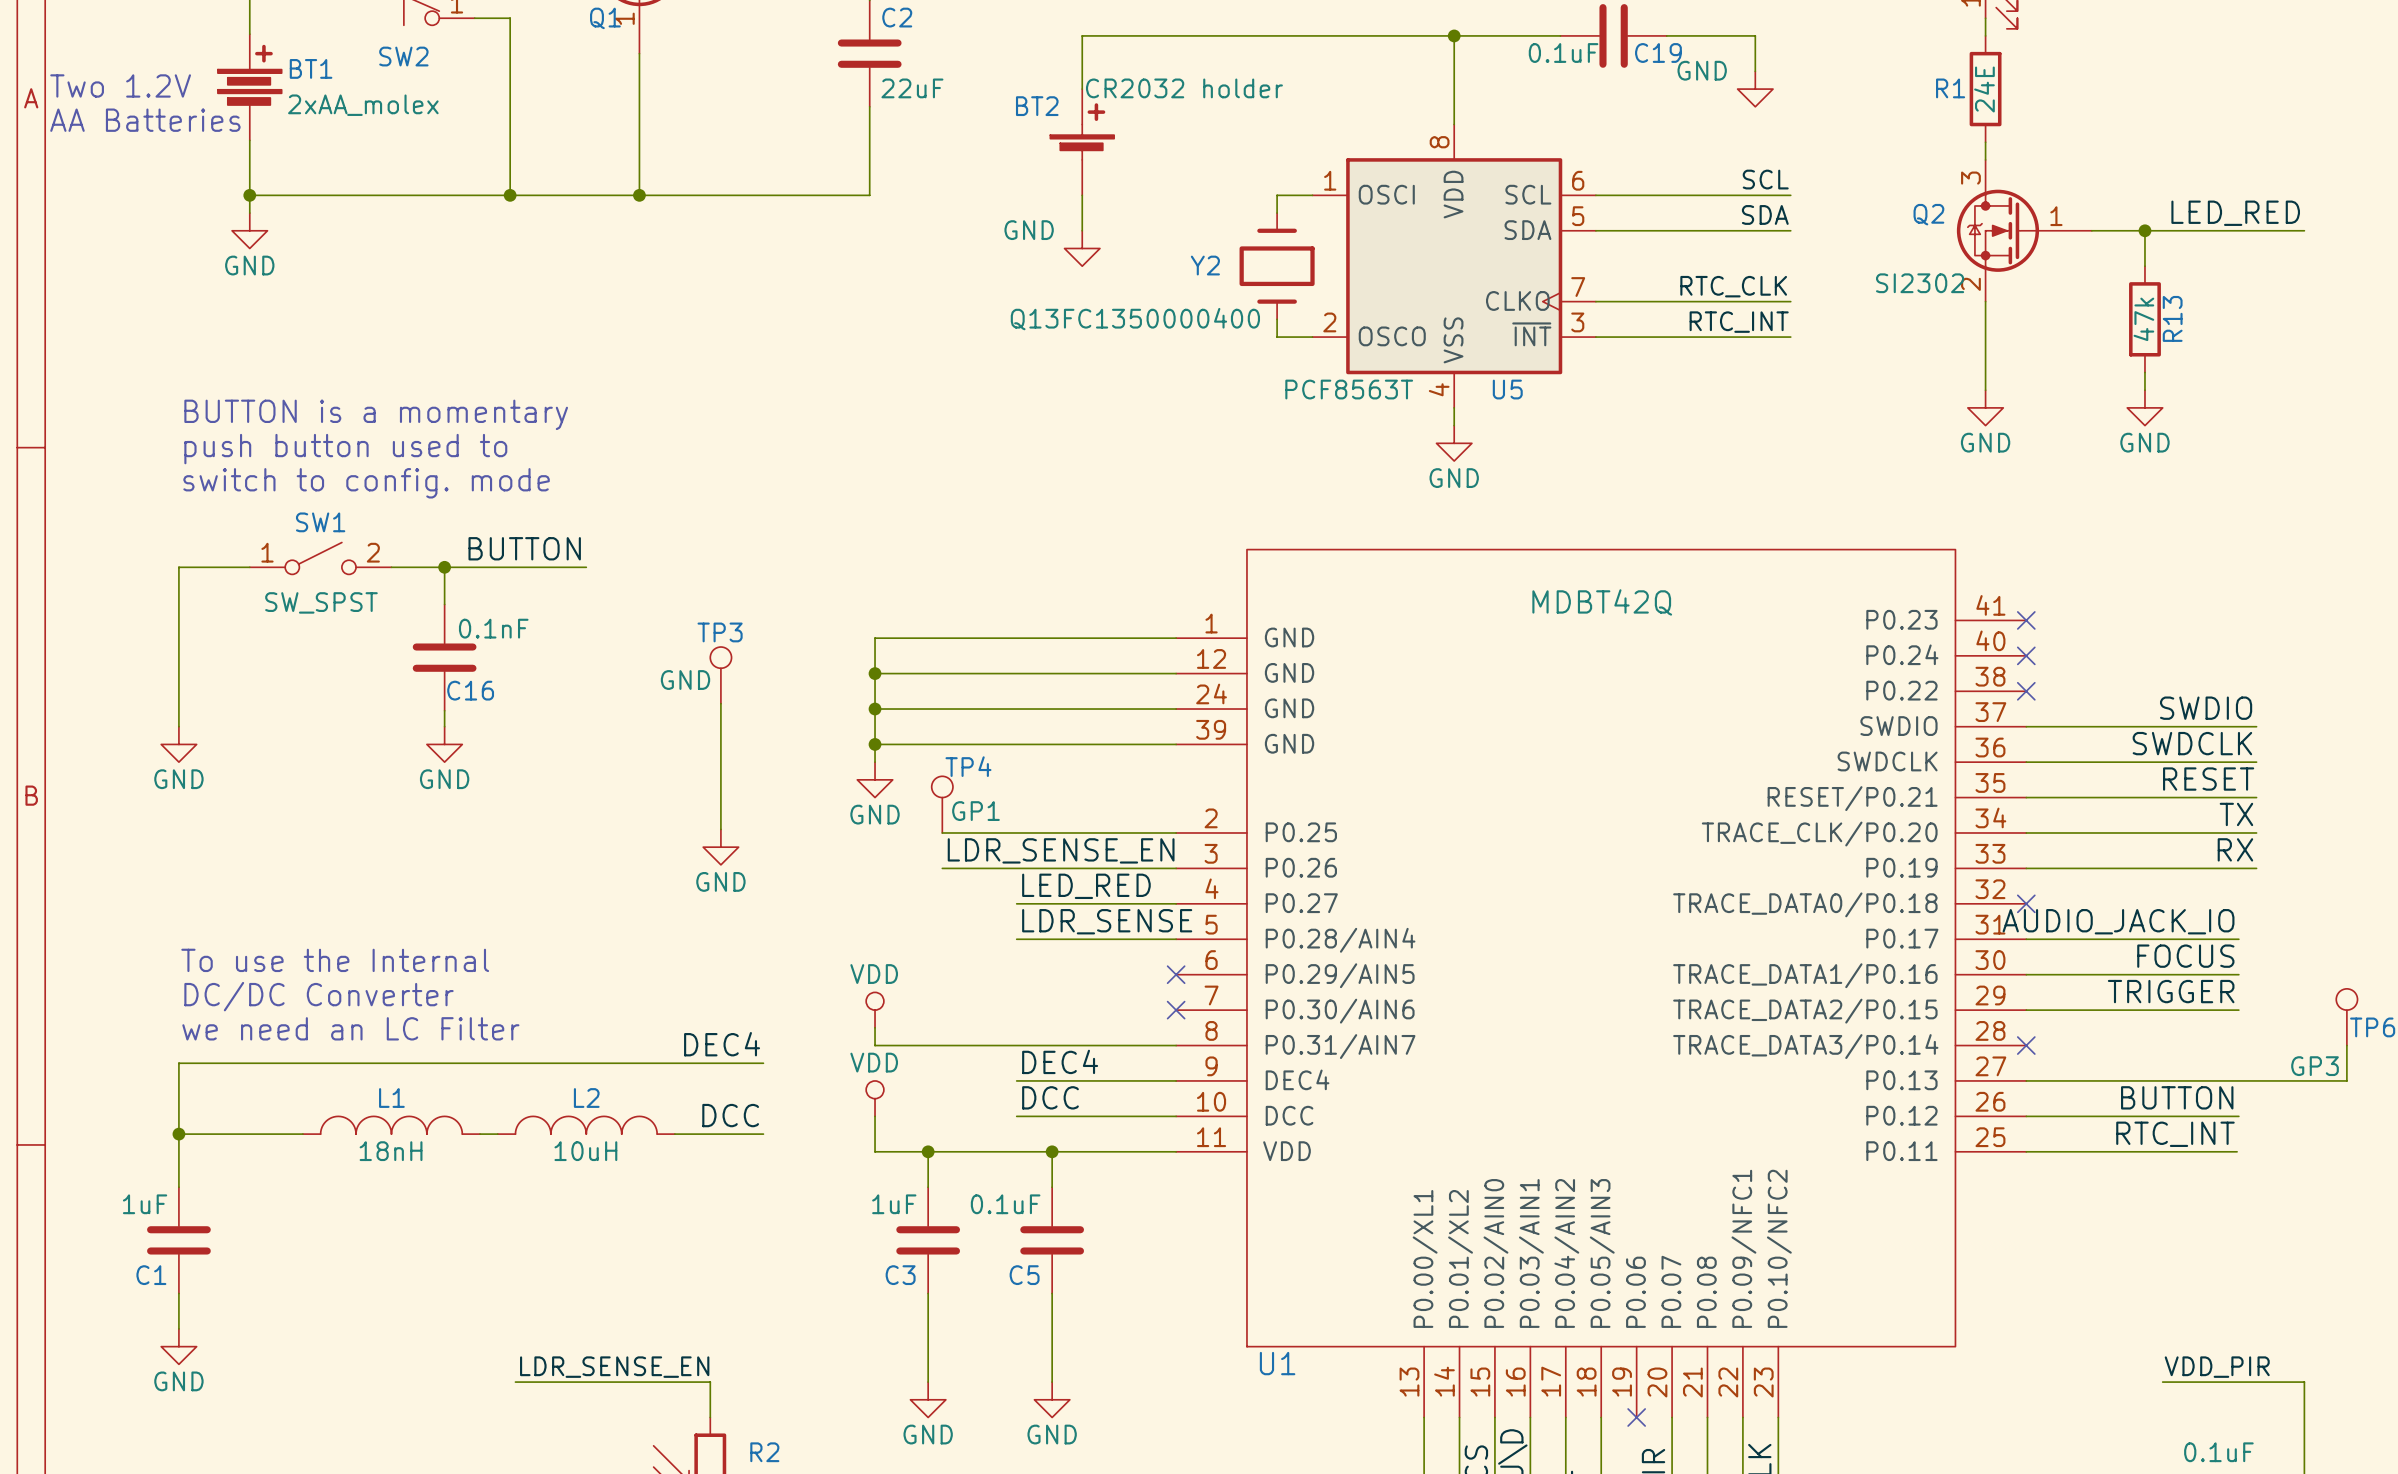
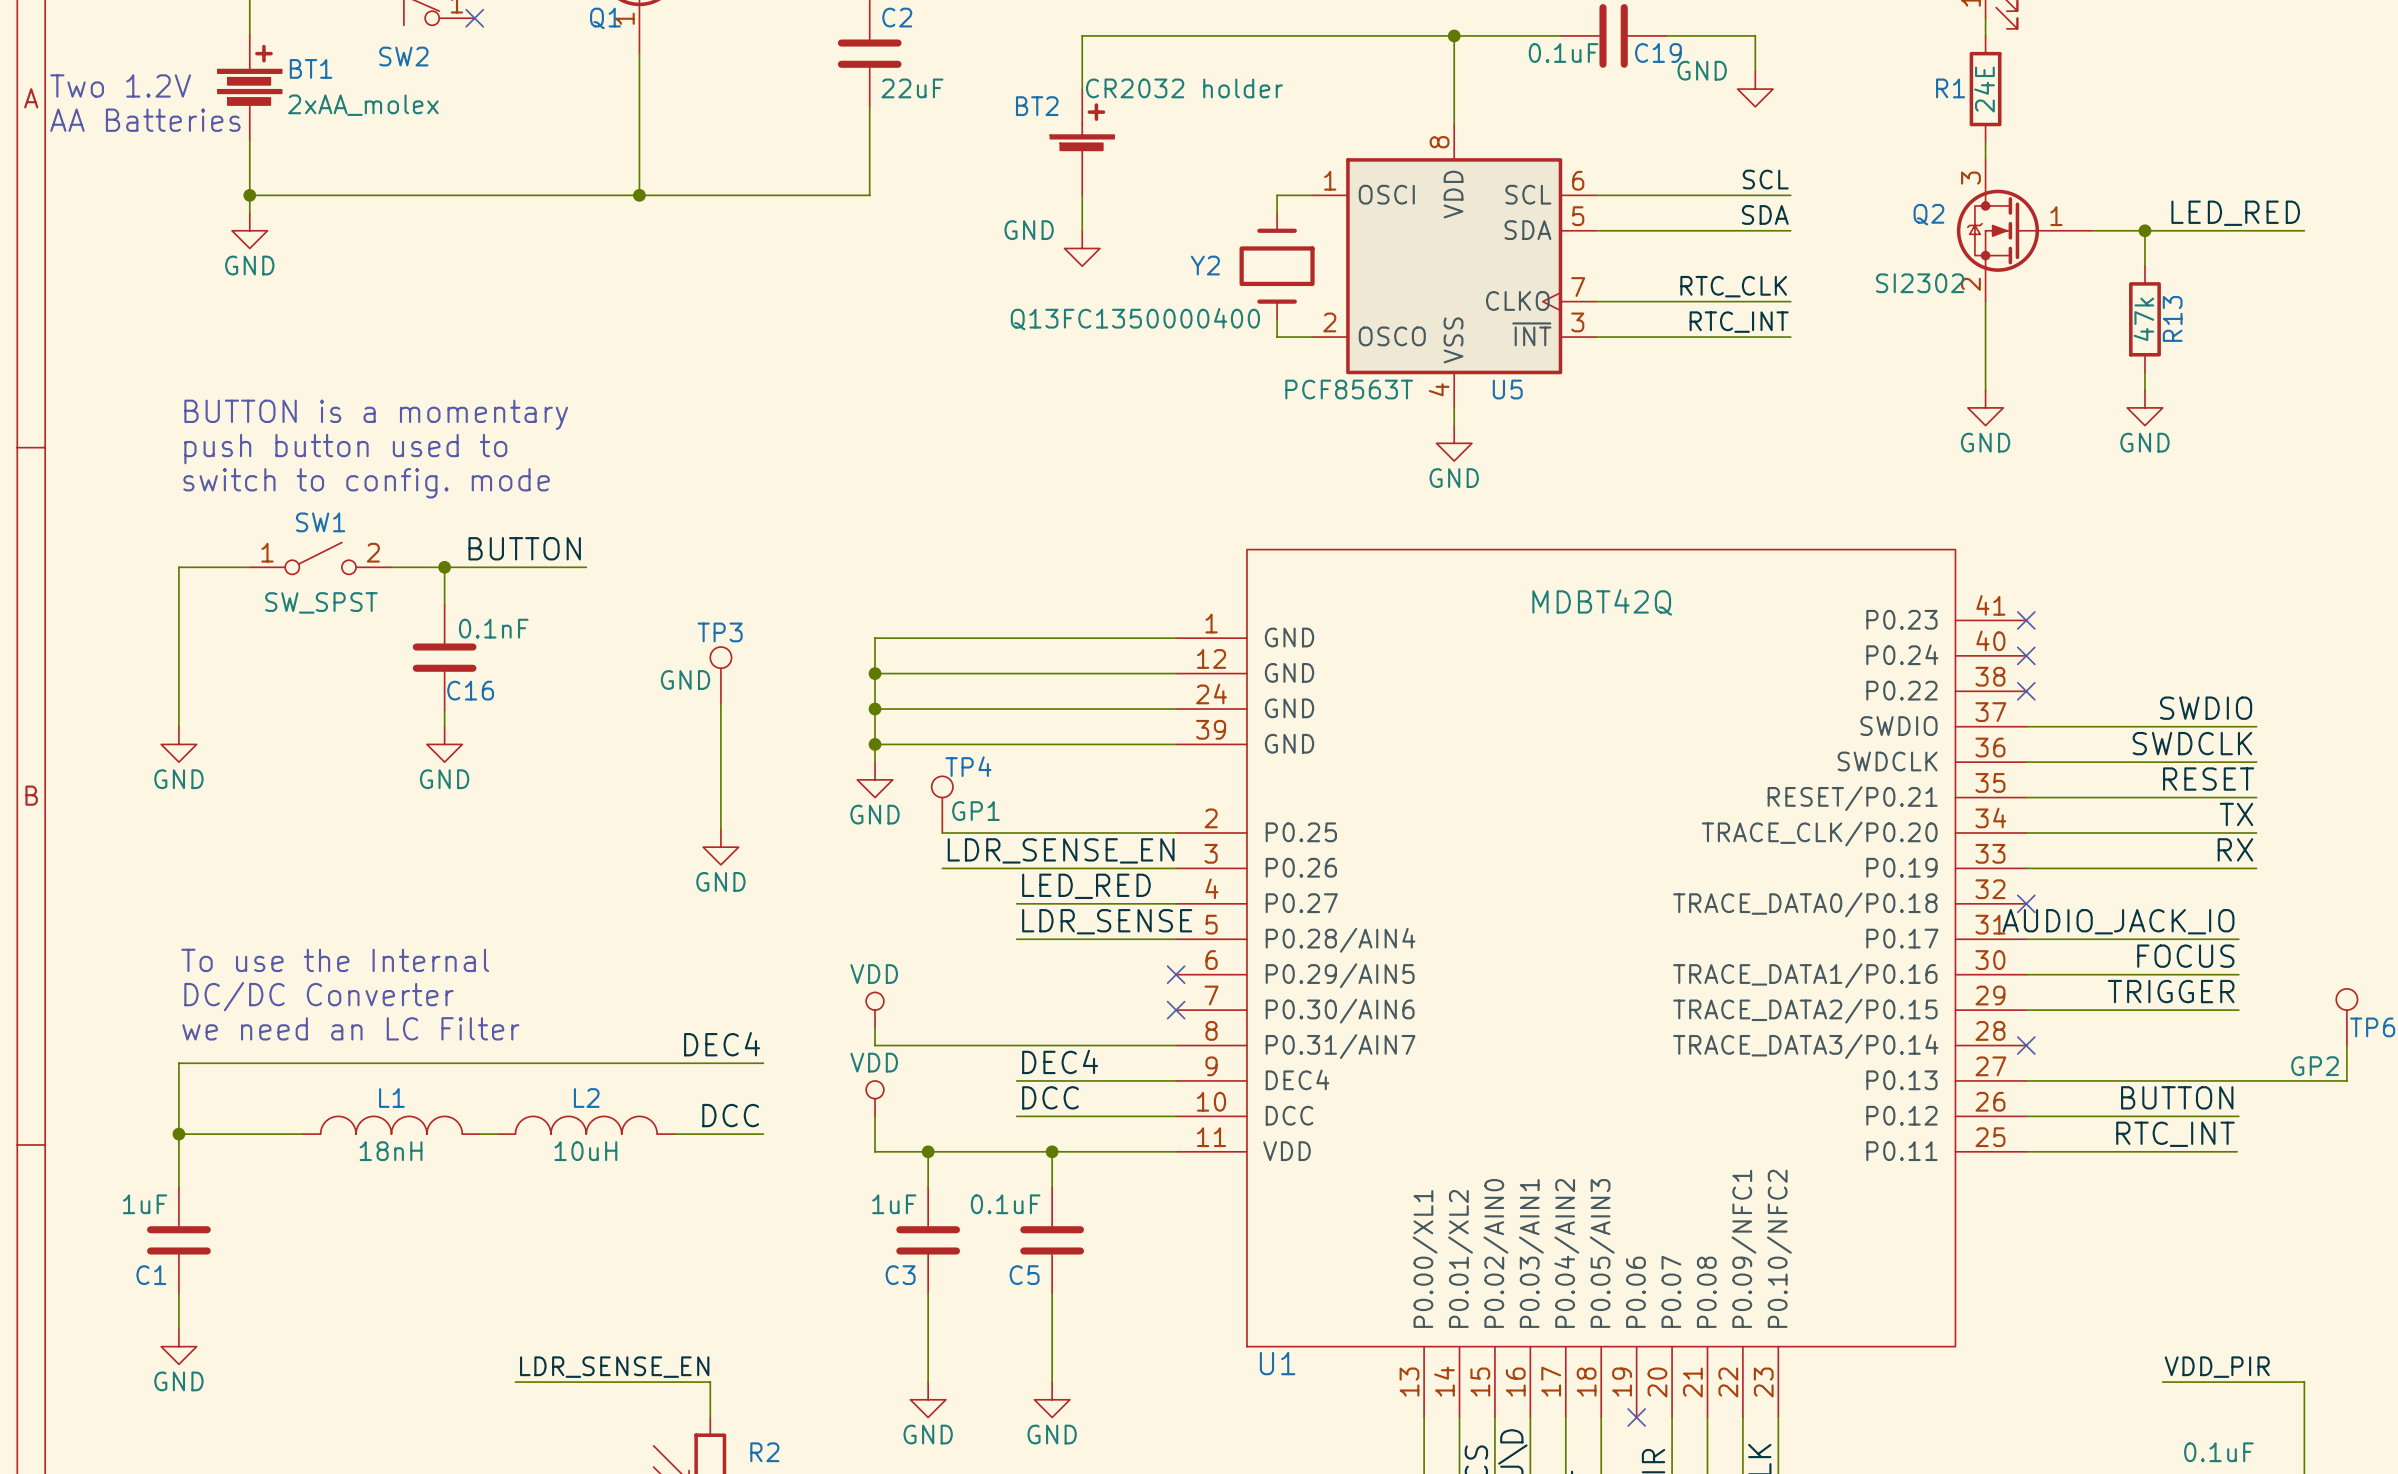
wire: (474, 18) (510, 18) (510, 195) -> none
no-connect mark: none -> (474, 18)
junction: (510, 195) -> none
TP6 value: GP3 (2315, 1066) -> GP2 (2315, 1066)

